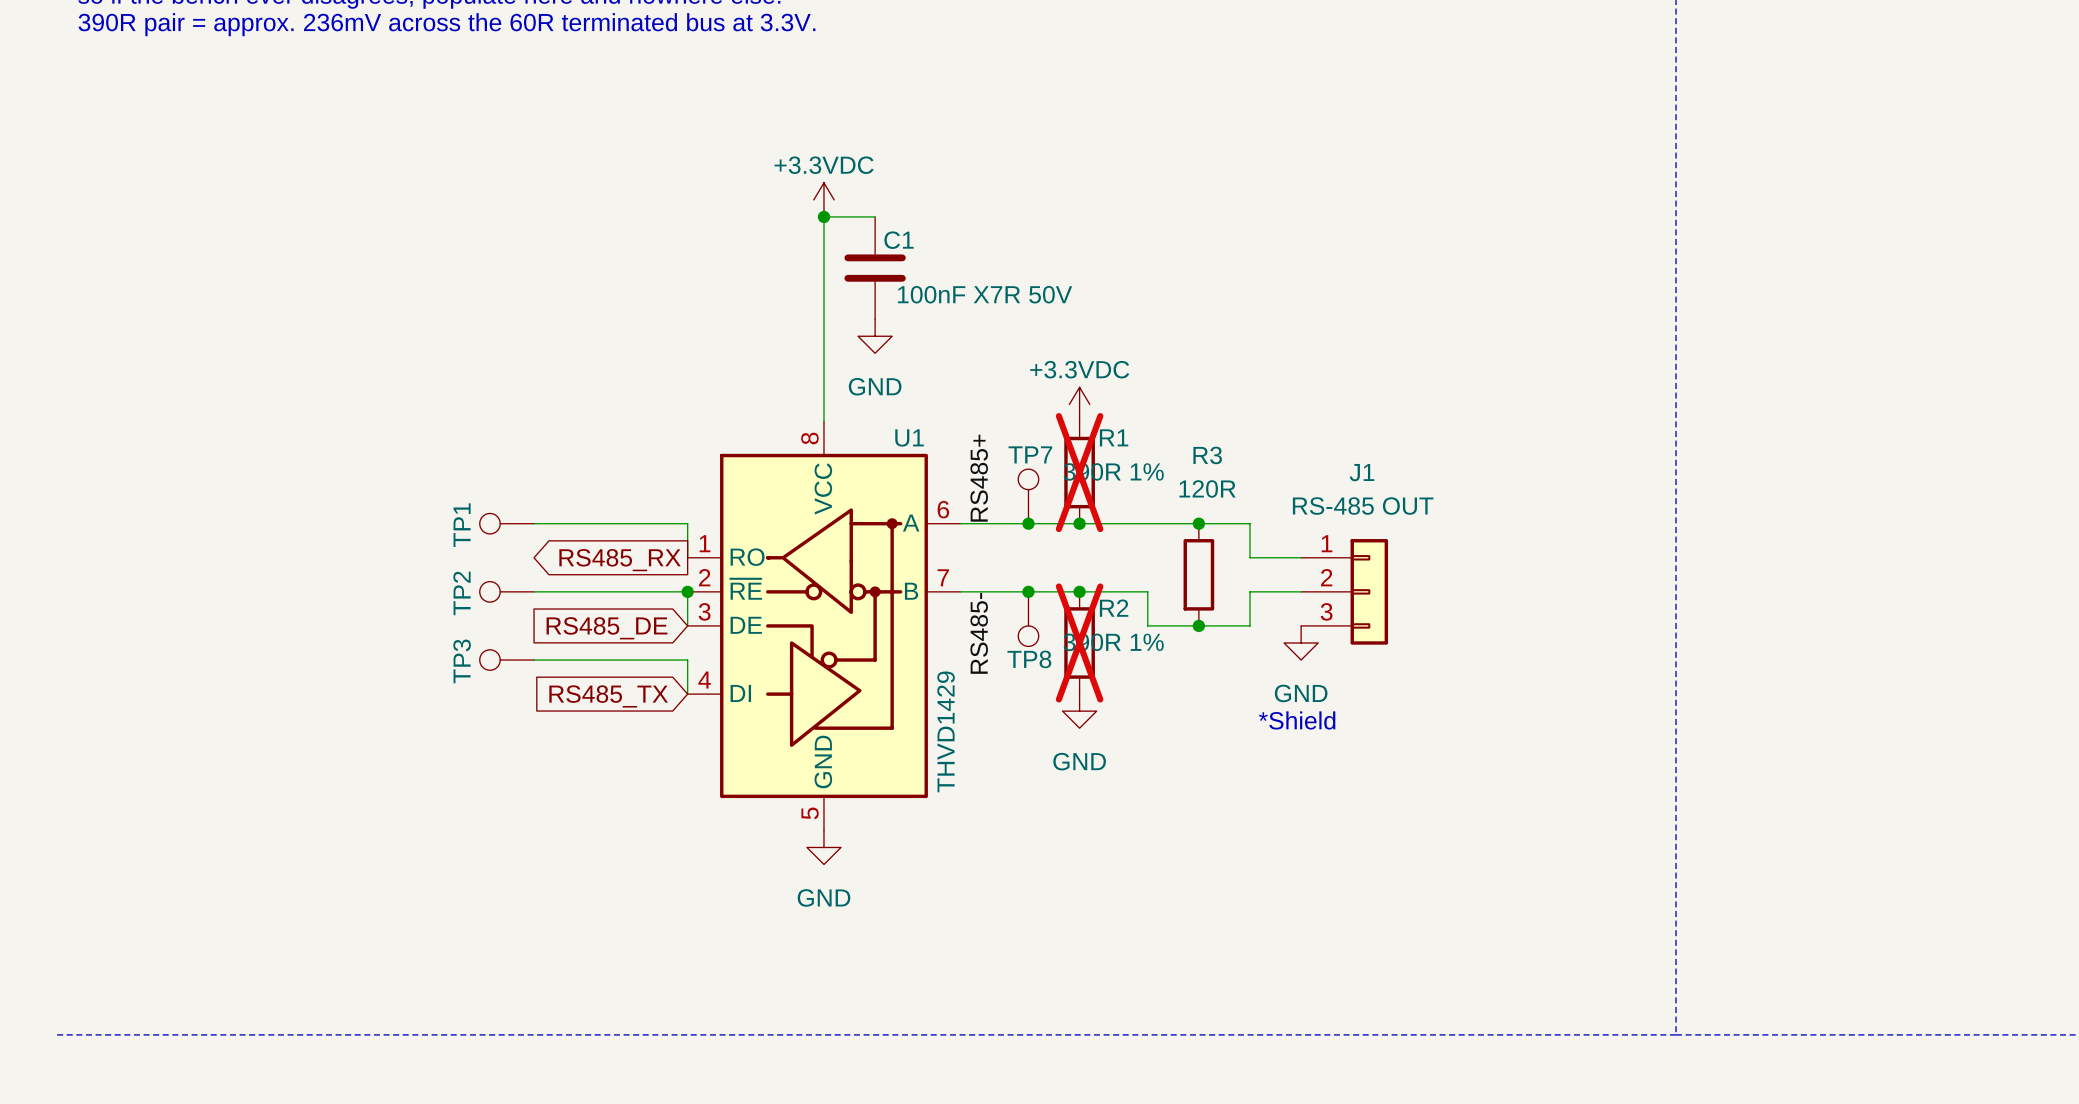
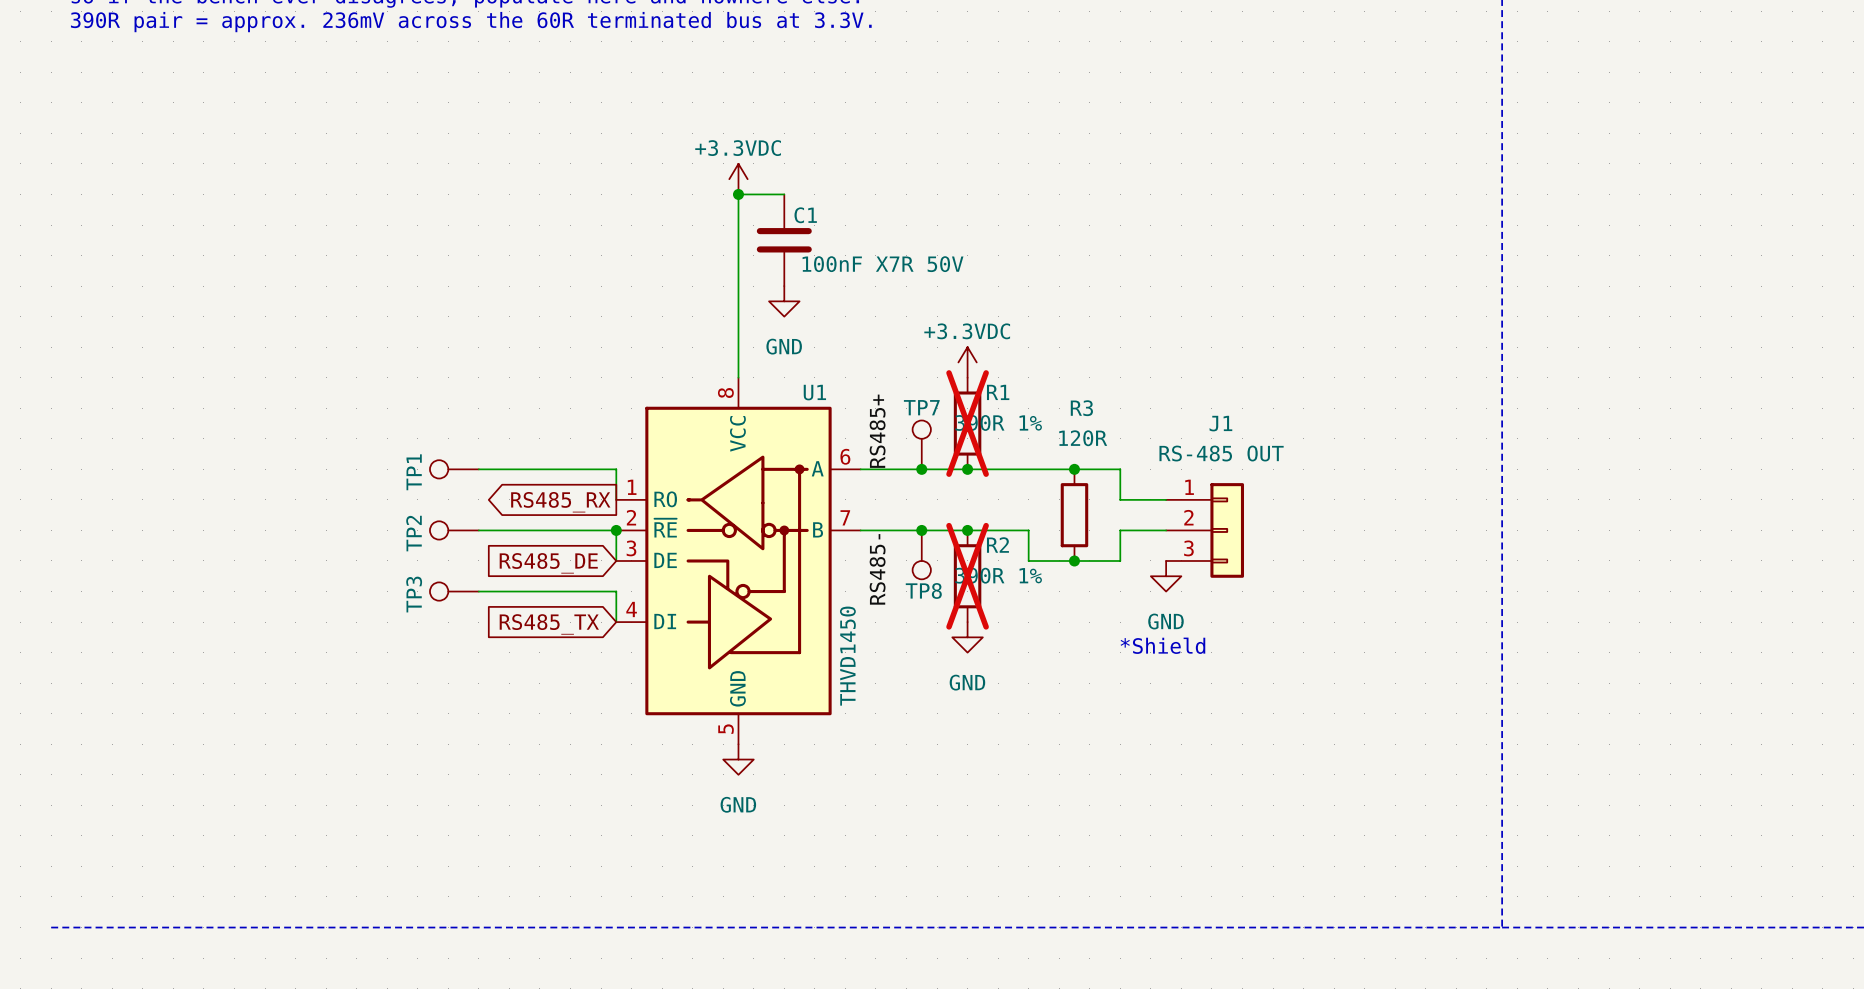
U1 value: THVD1429 (946, 731) -> THVD1450 (847, 656)

